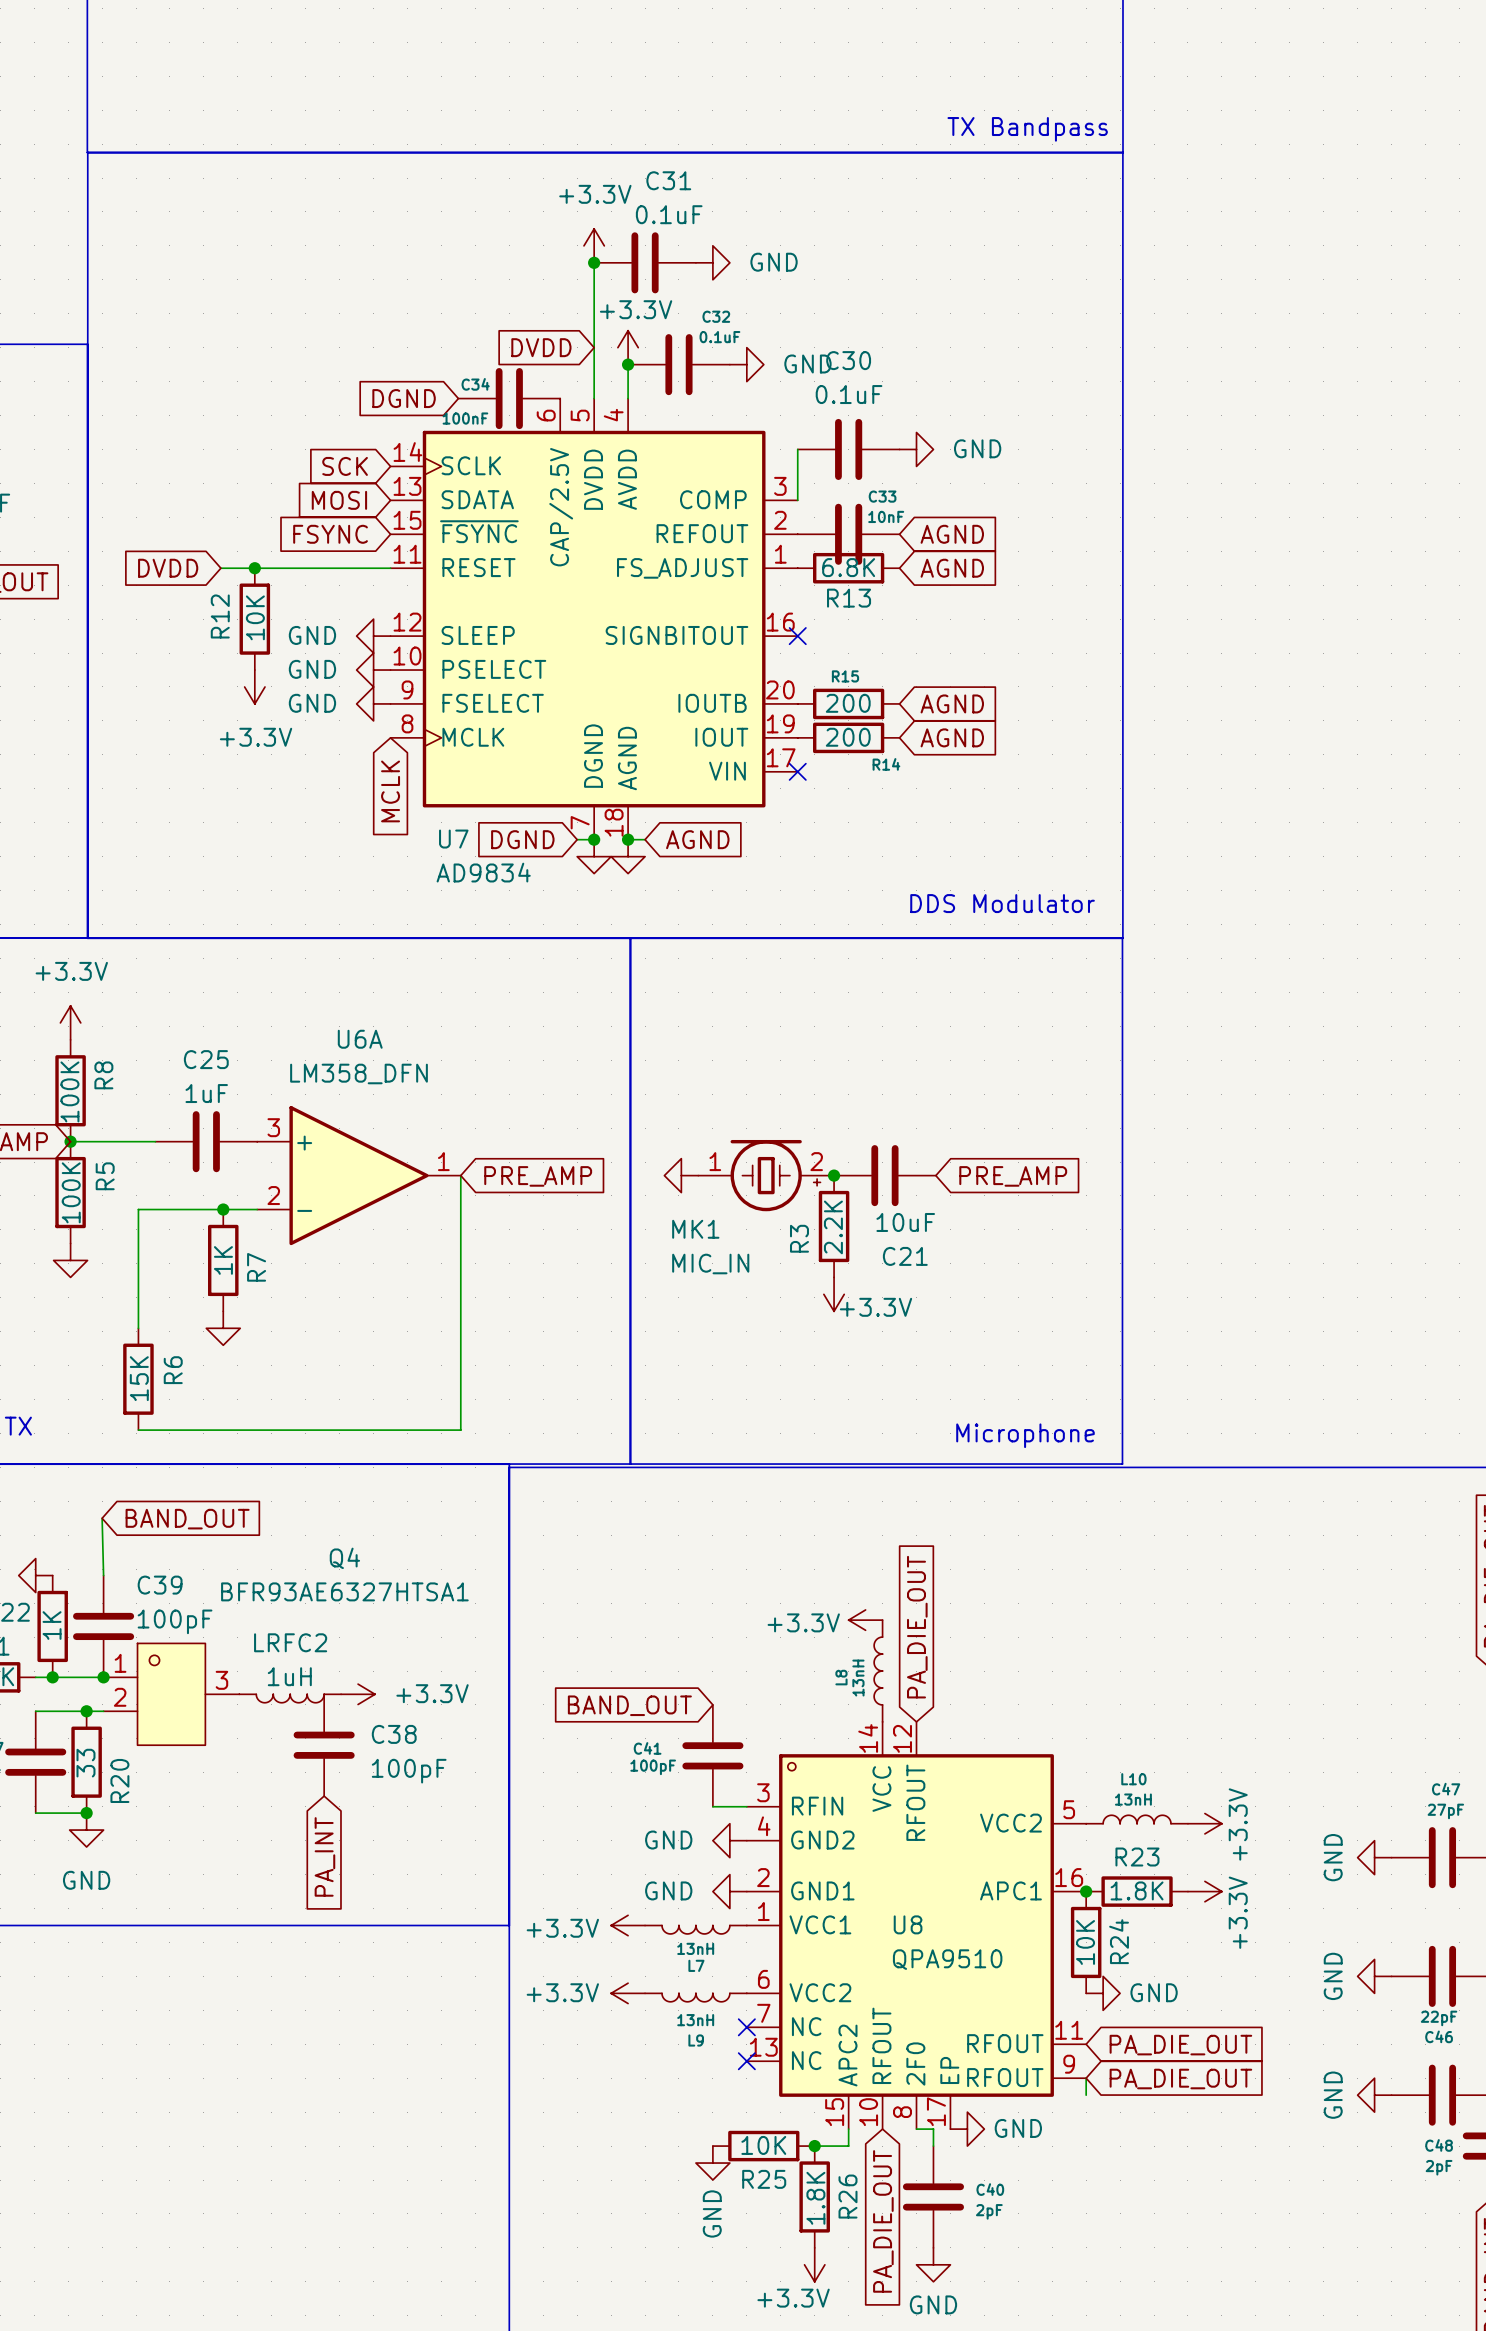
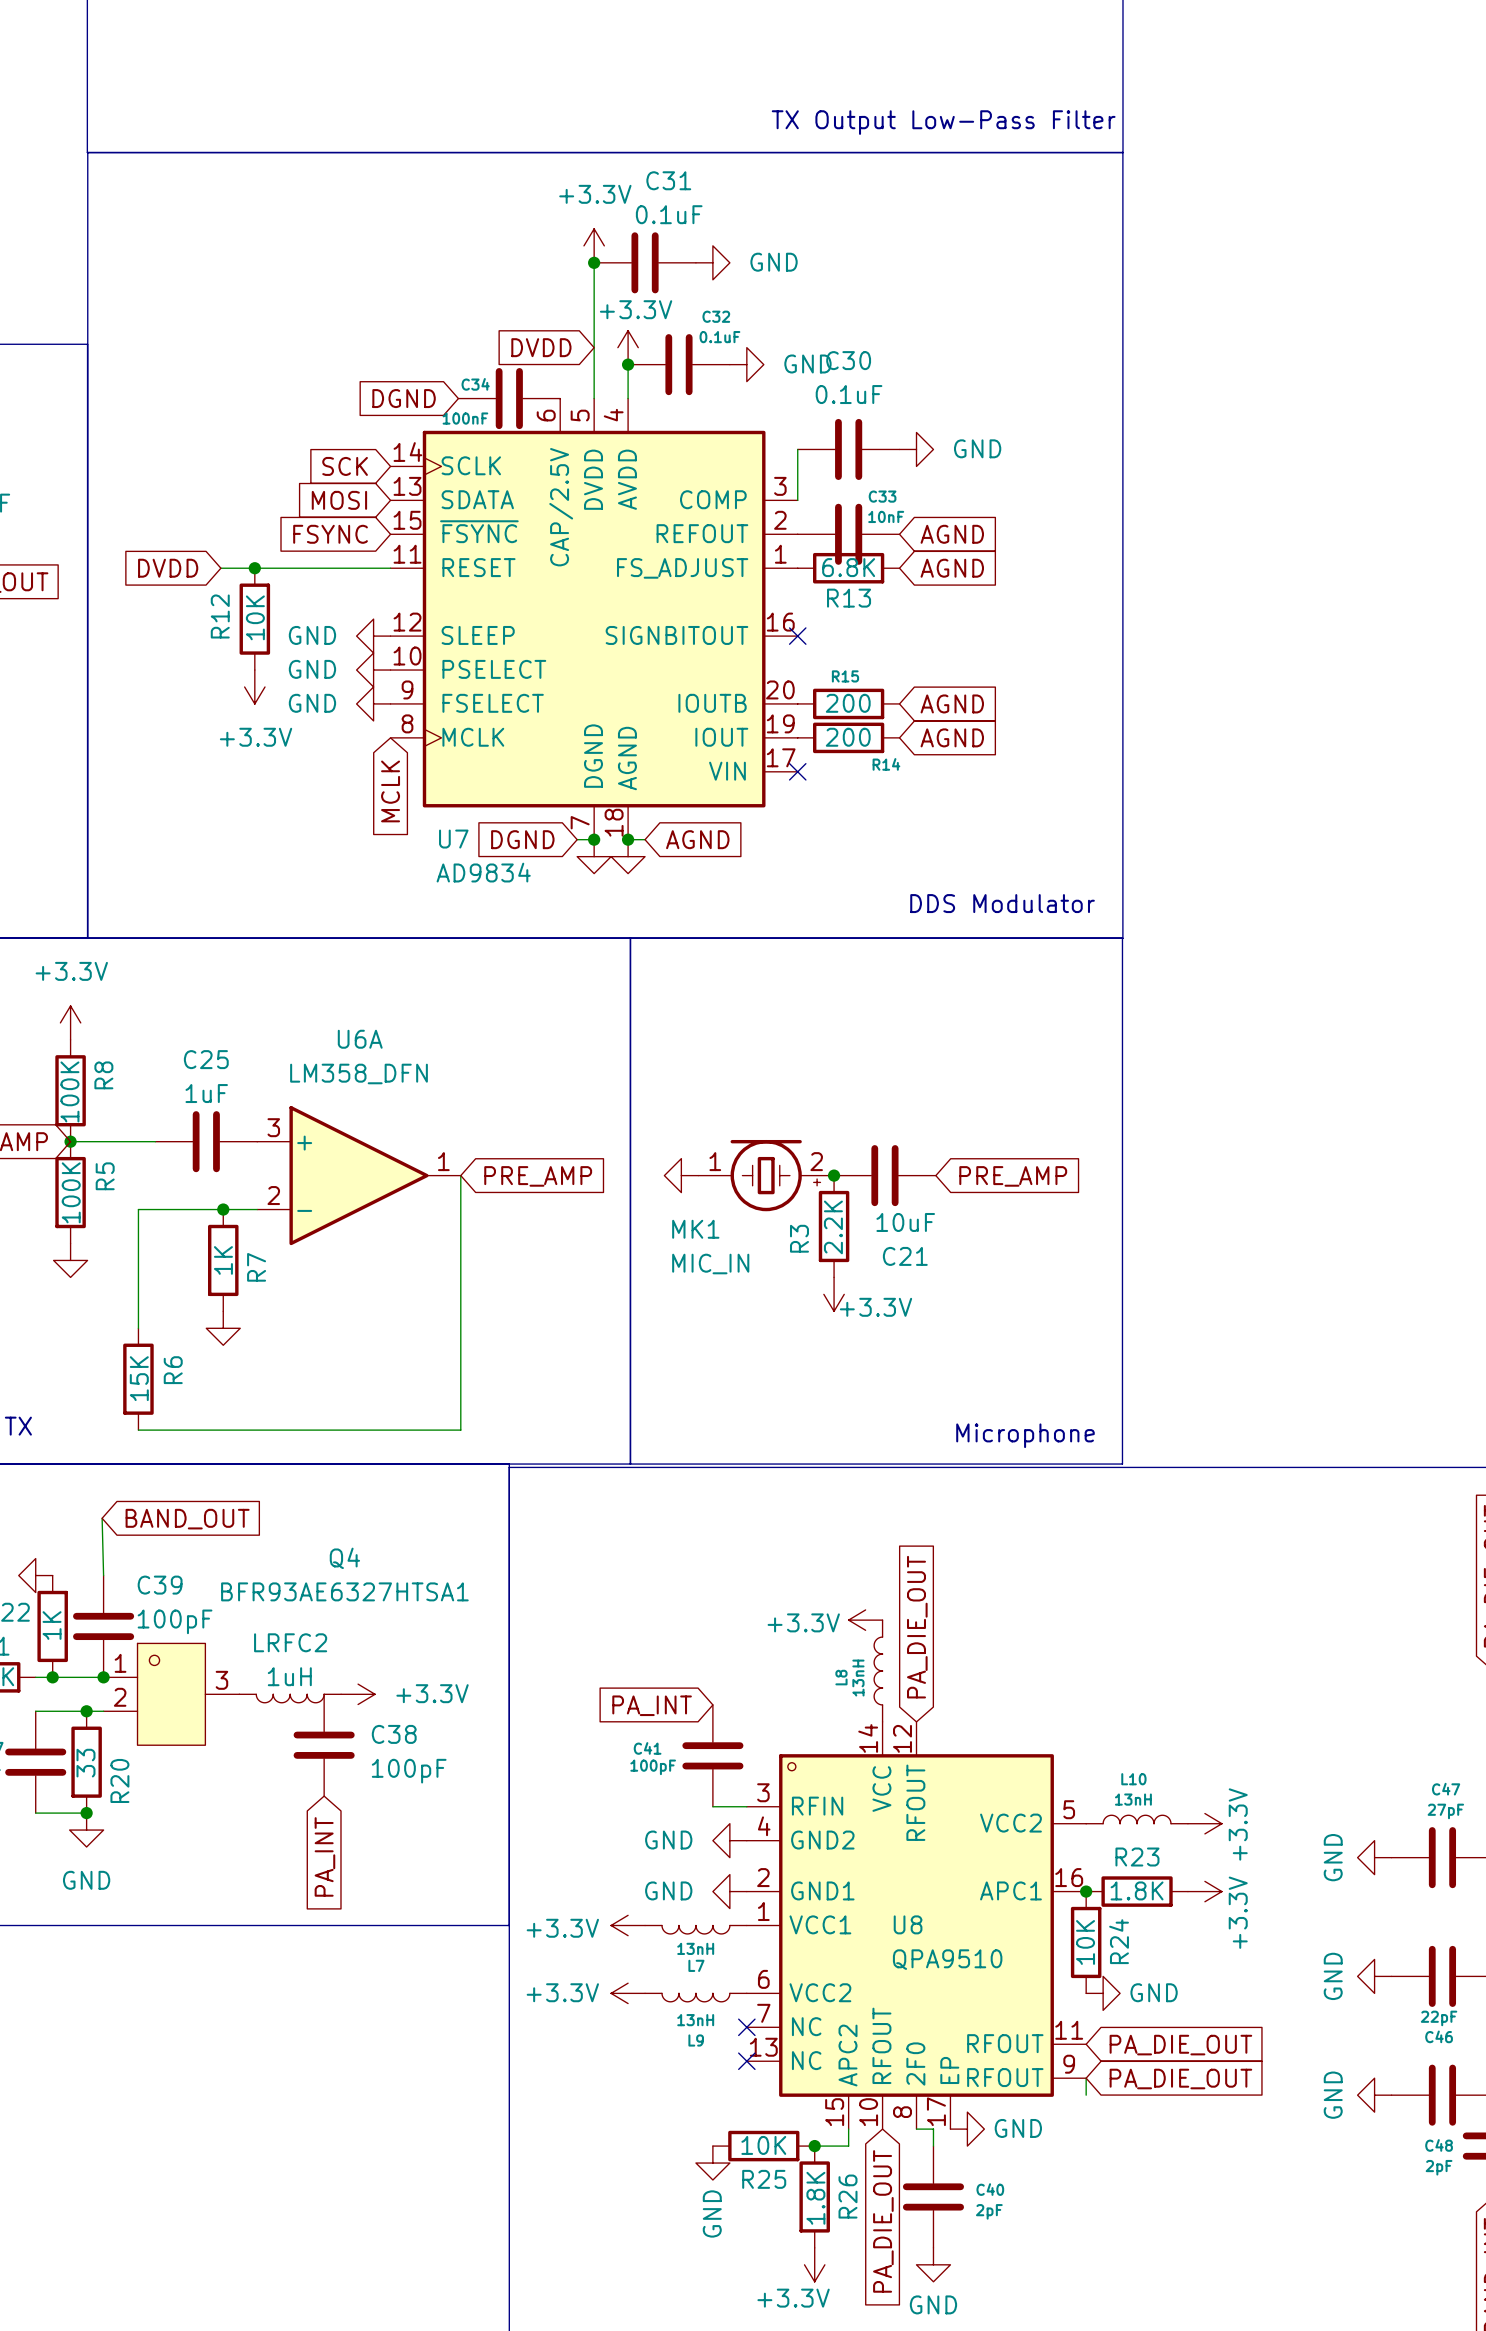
text: none -> TX Output Low-Pass Filter (943, 122)
text: TX Bandpass (1027, 129) -> none
global label: BAND_OUT (629, 1705) -> PA_INT (652, 1705)

